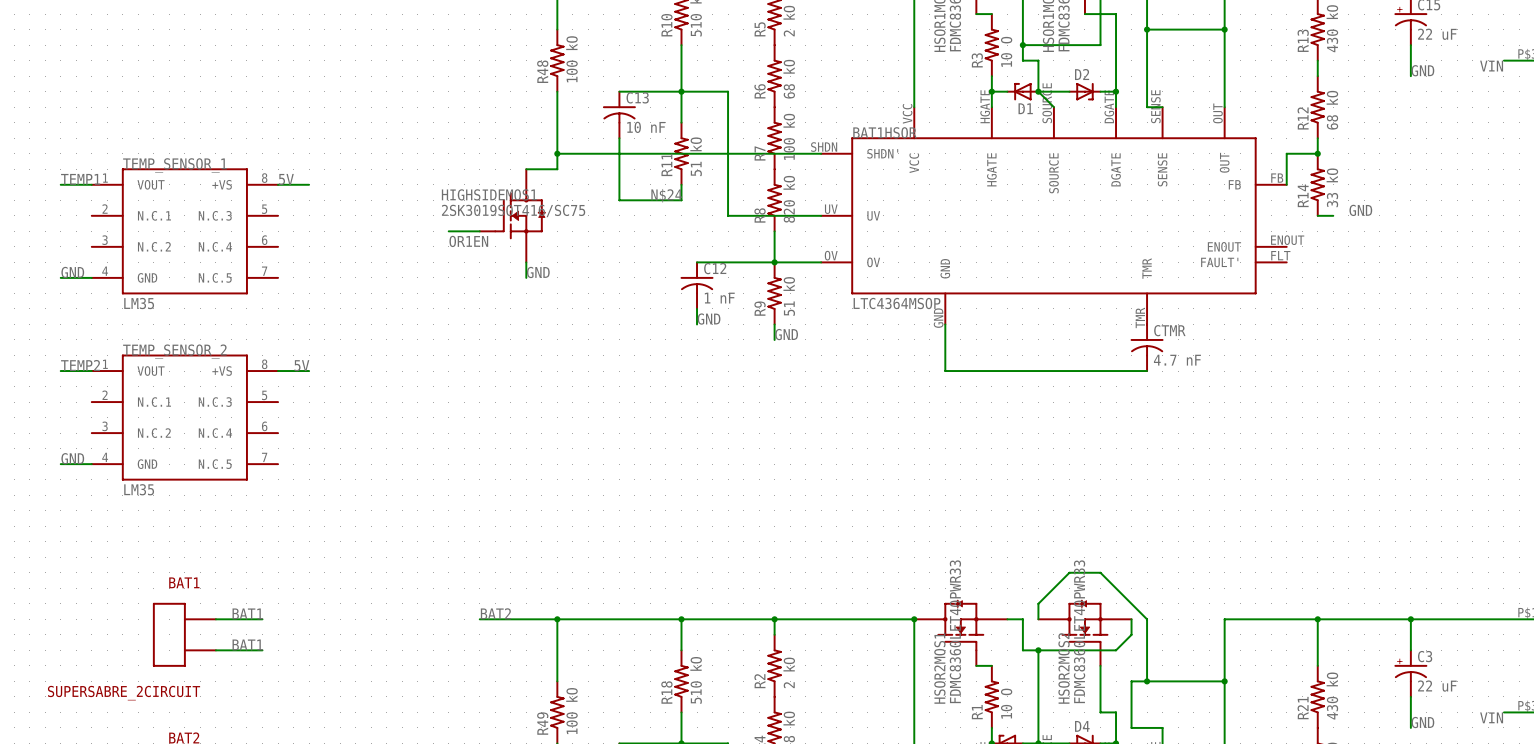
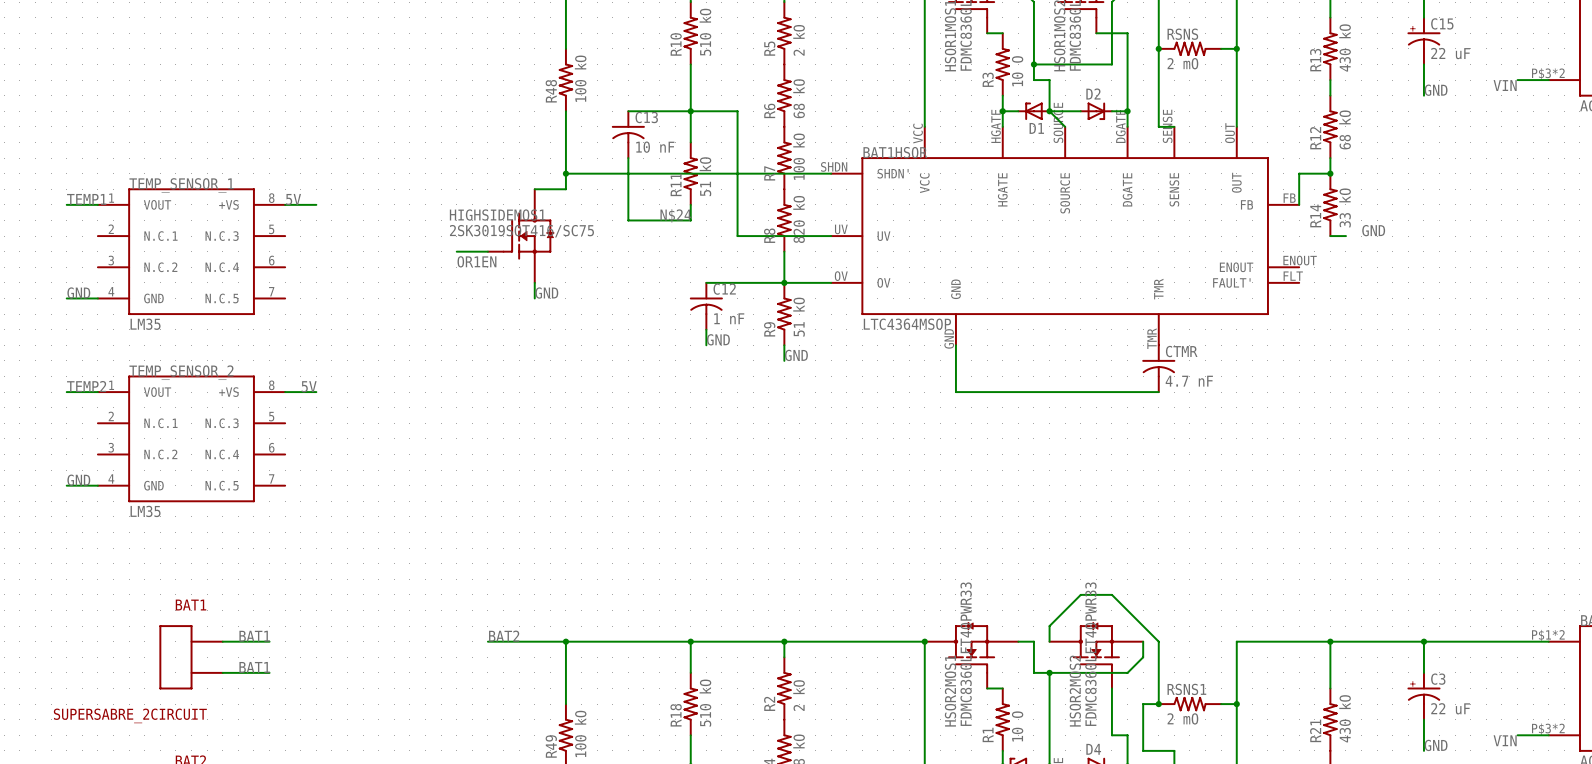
RSNS: none -> 2 mO (1189, 48)
RSNS1: none -> 2 mO (1189, 704)

